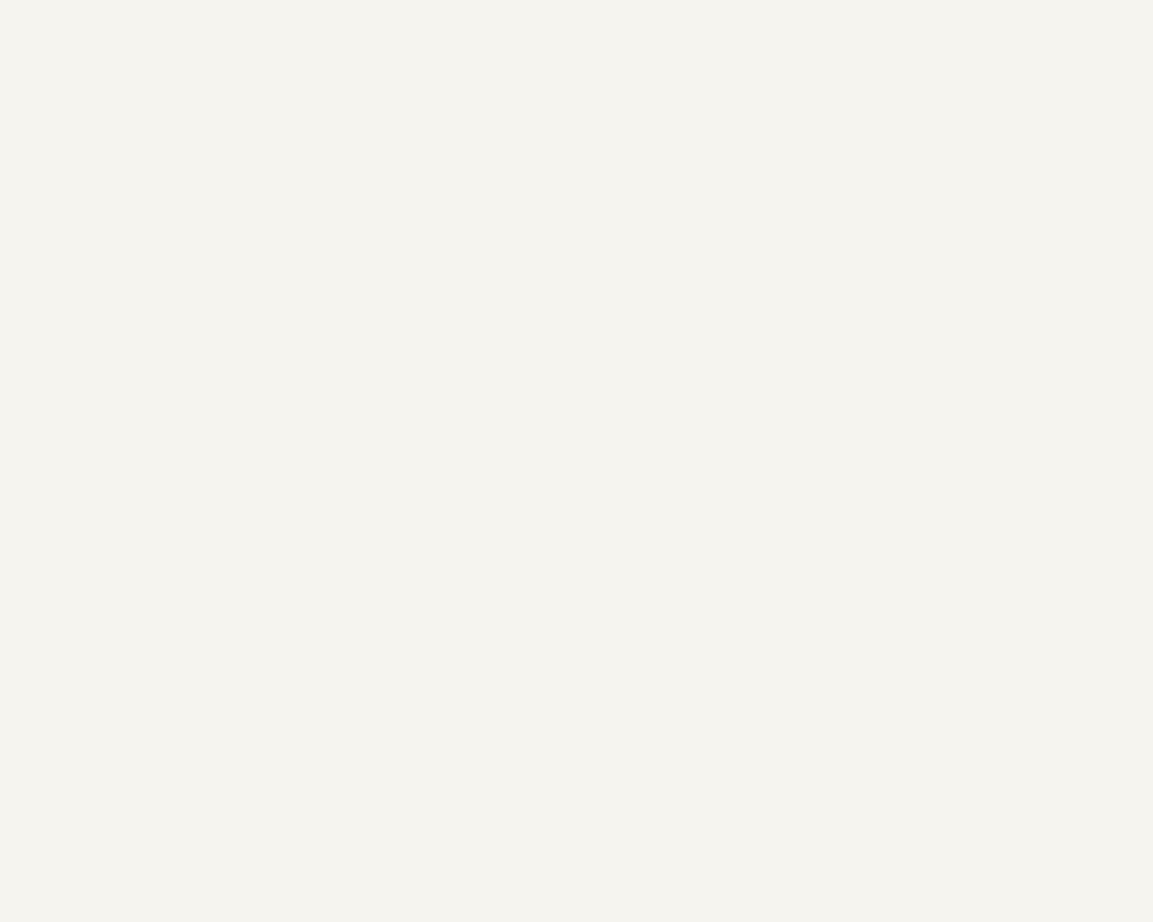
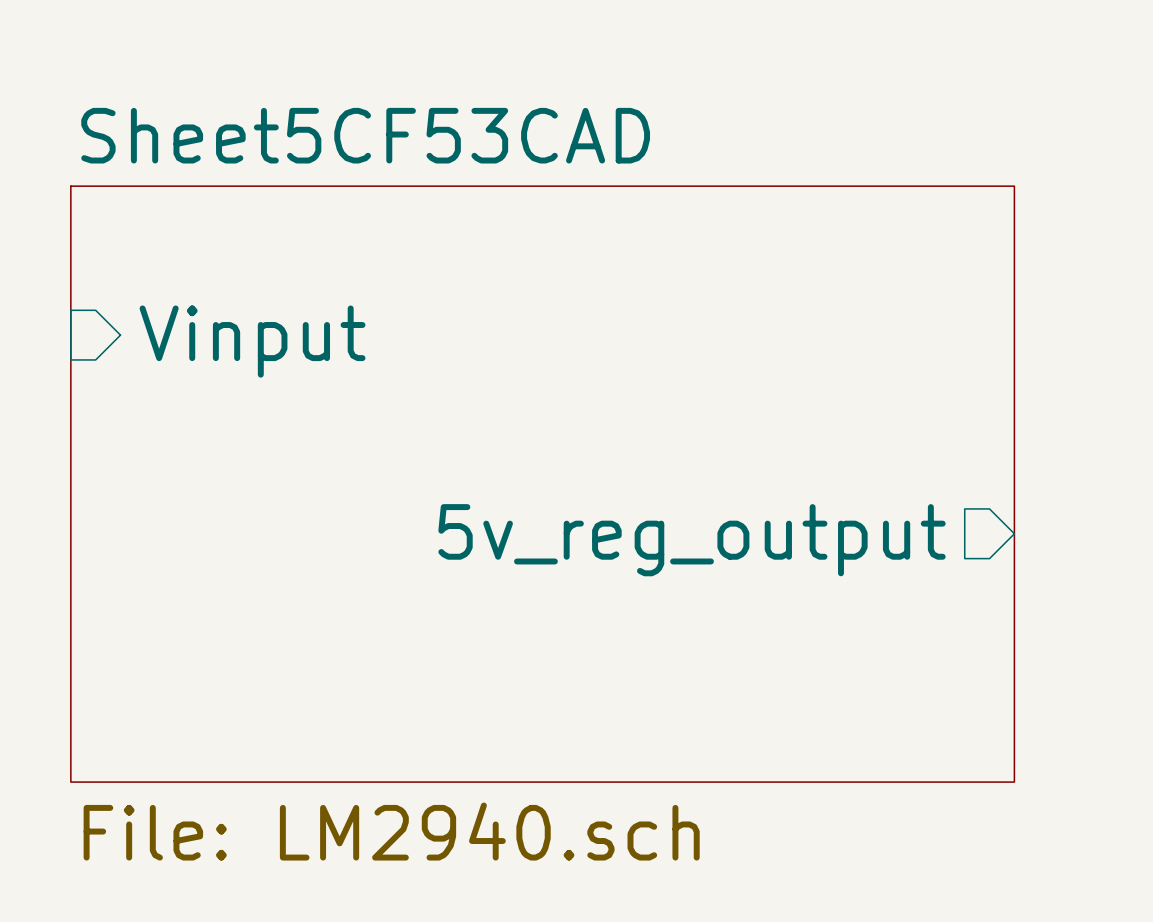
sheet pin: none -> Vinput (252, 341)
sheet Sheet5CF53CAD: none -> File: LM2940.sch (542, 484)
sheet pin: none -> 5v_reg_output (692, 540)

